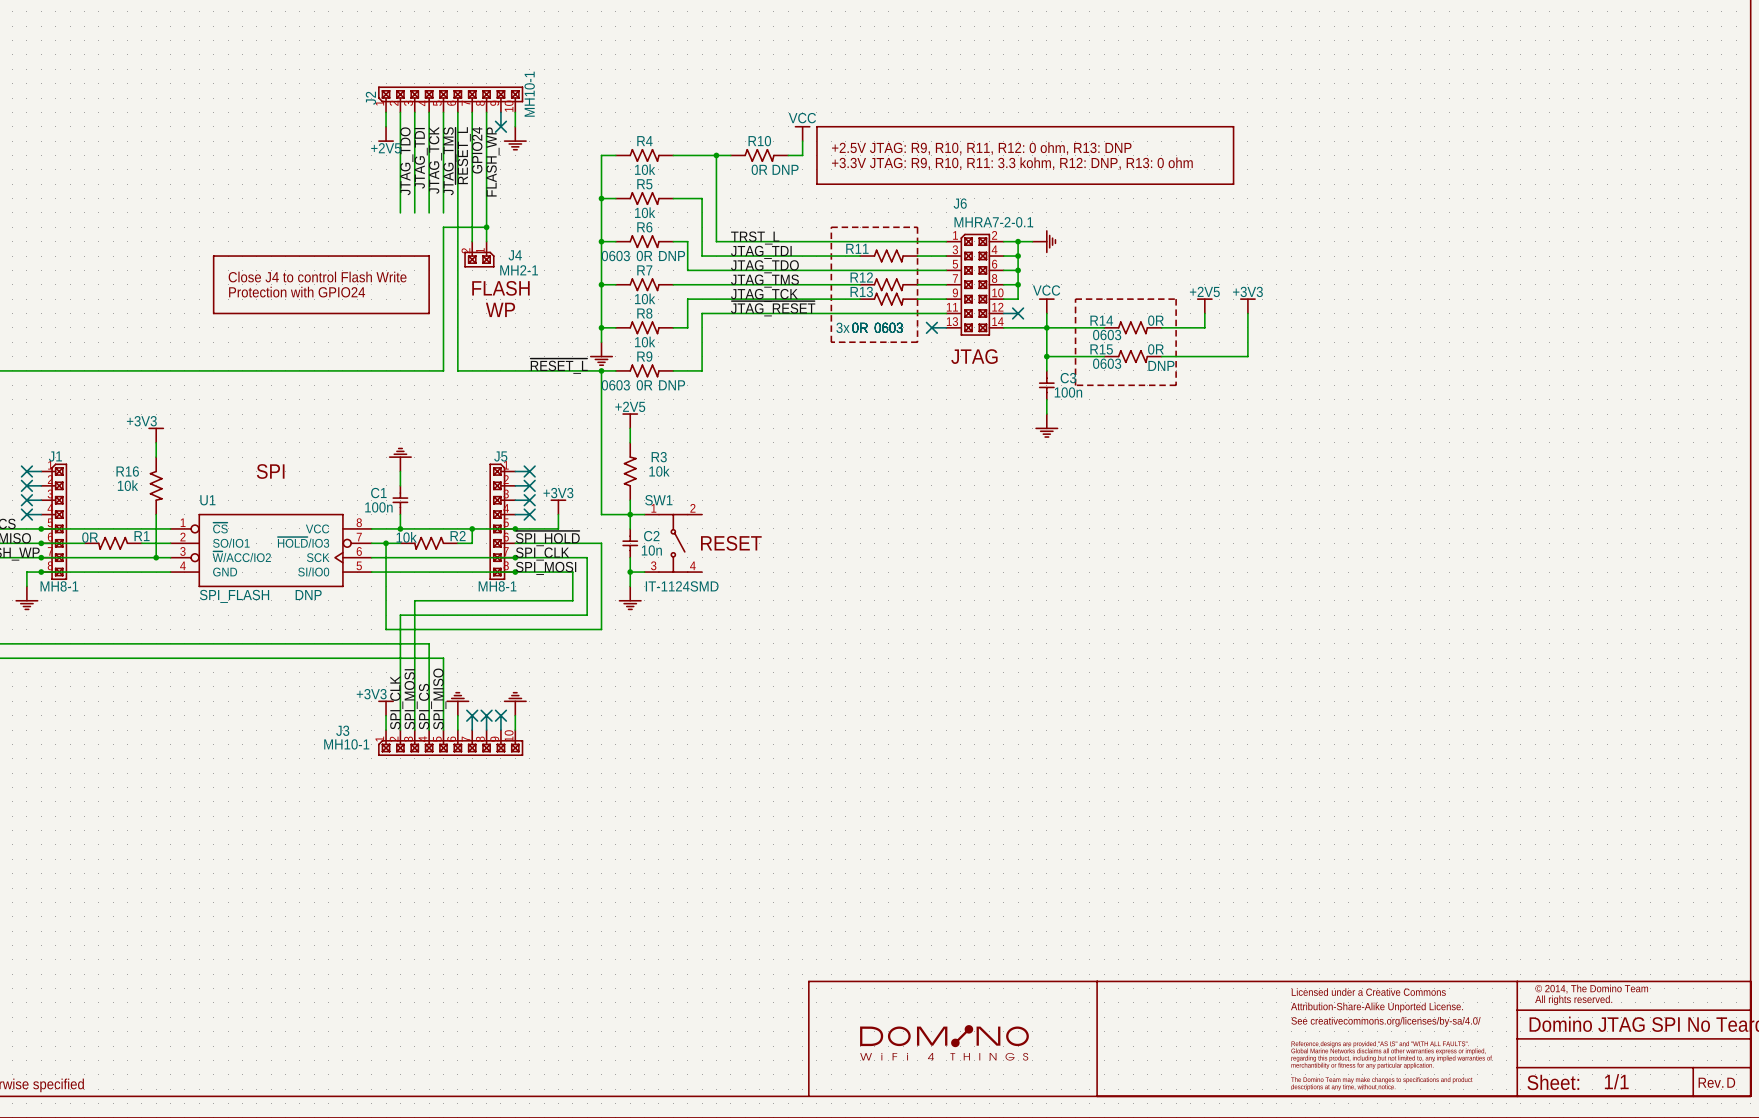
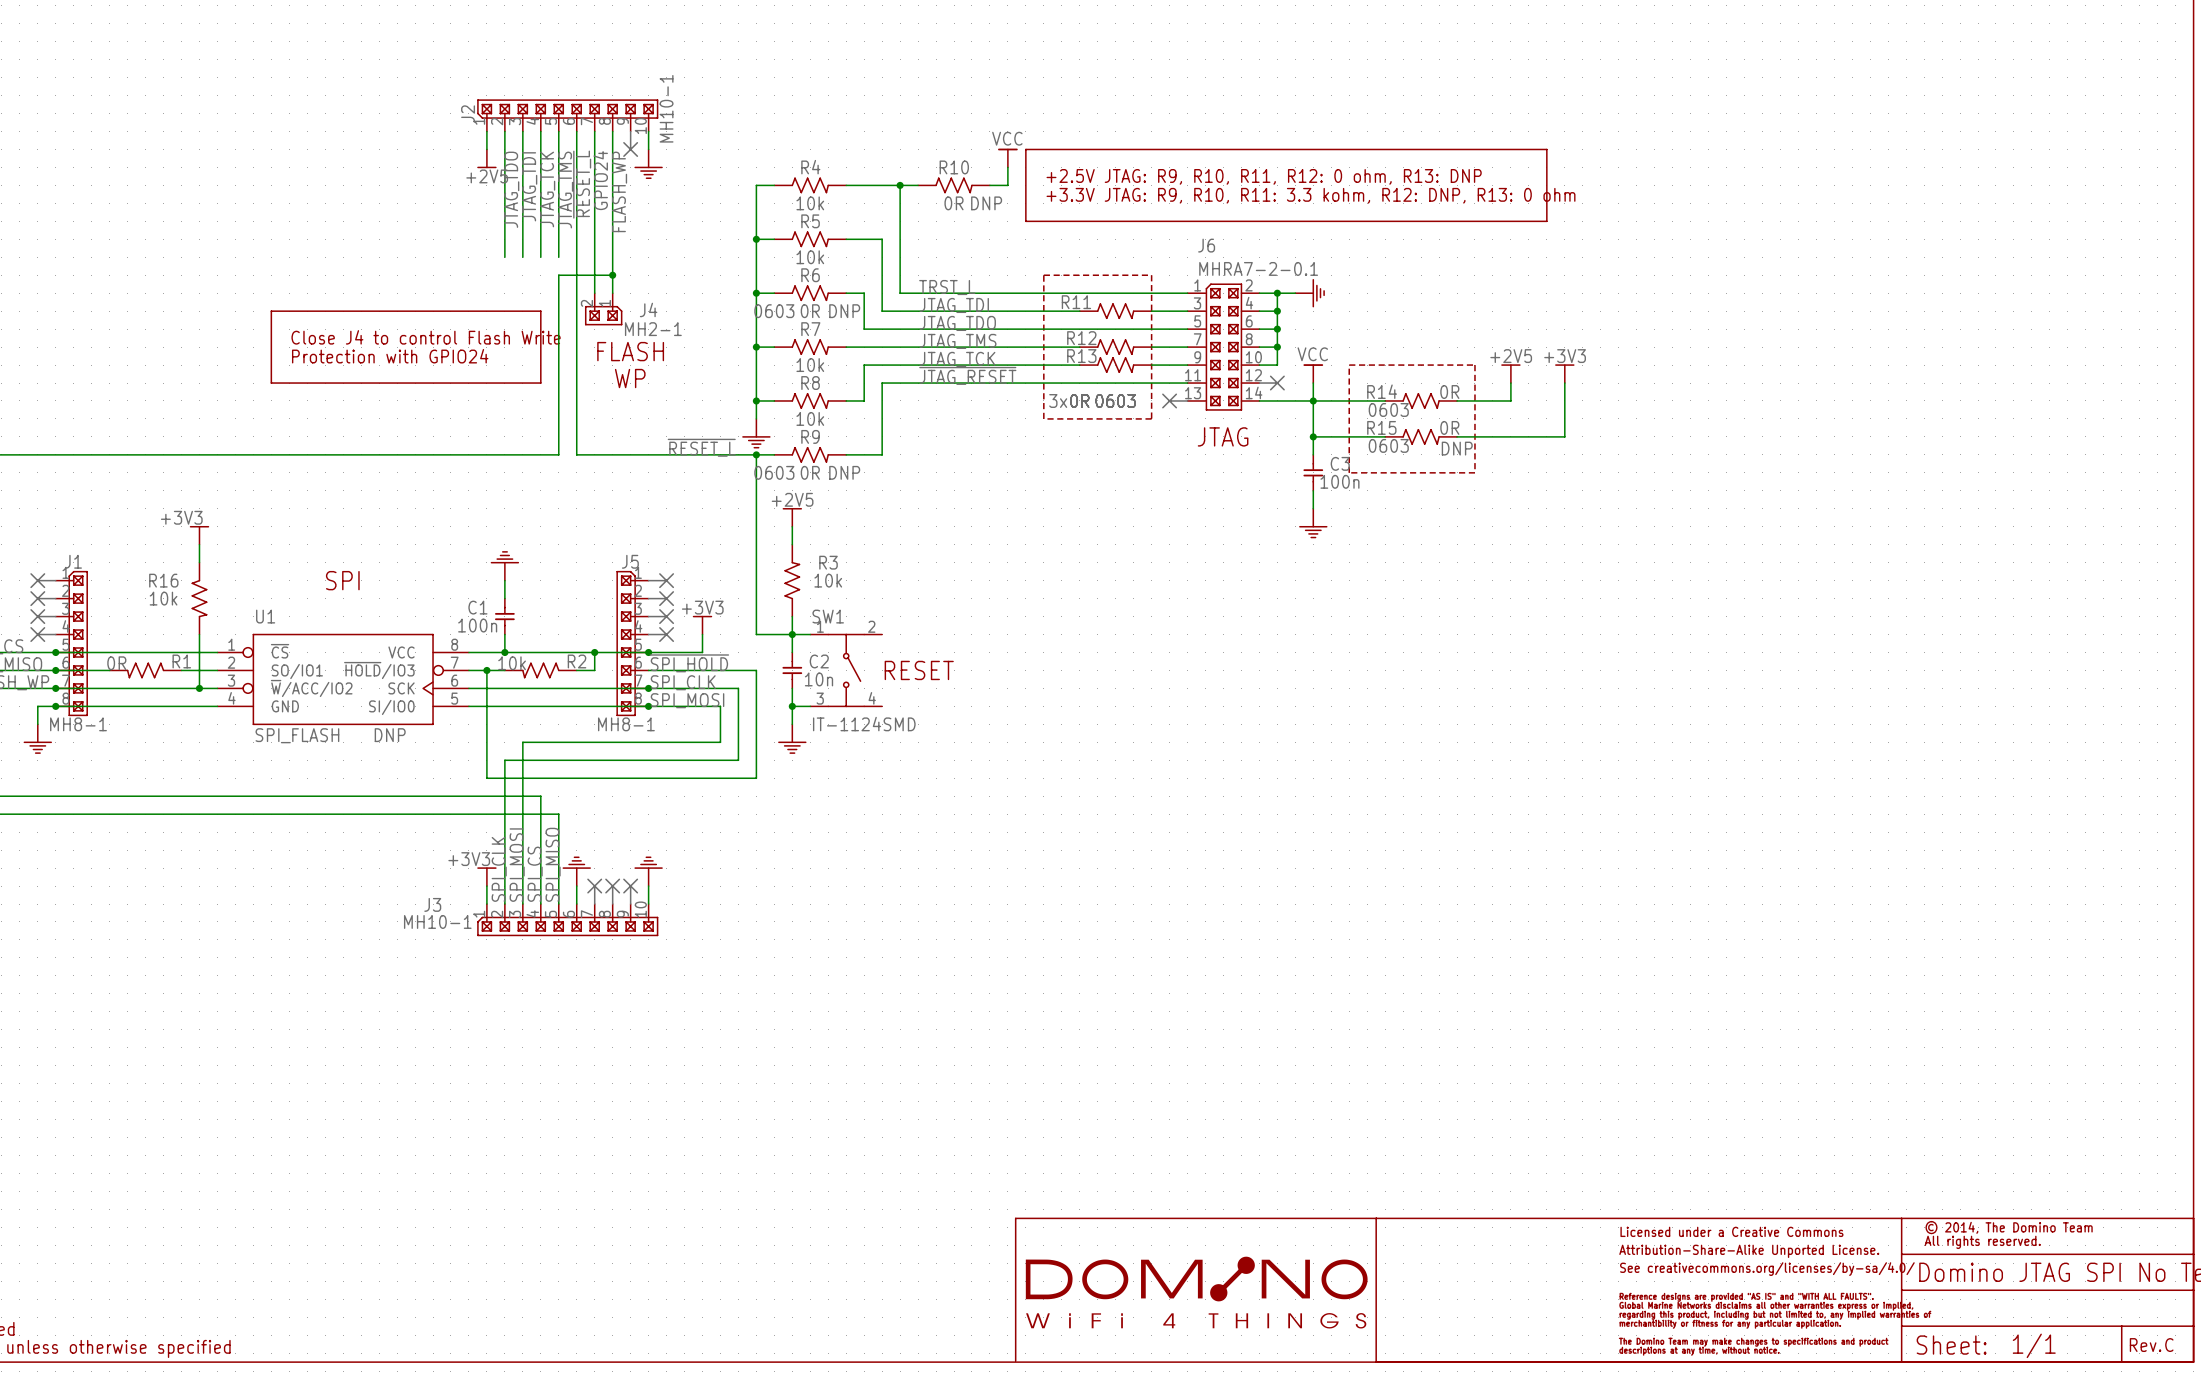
part: none -> (1196, 1292)
part: (944, 1042) -> none
text: D (1731, 1082) -> C (2169, 1345)

